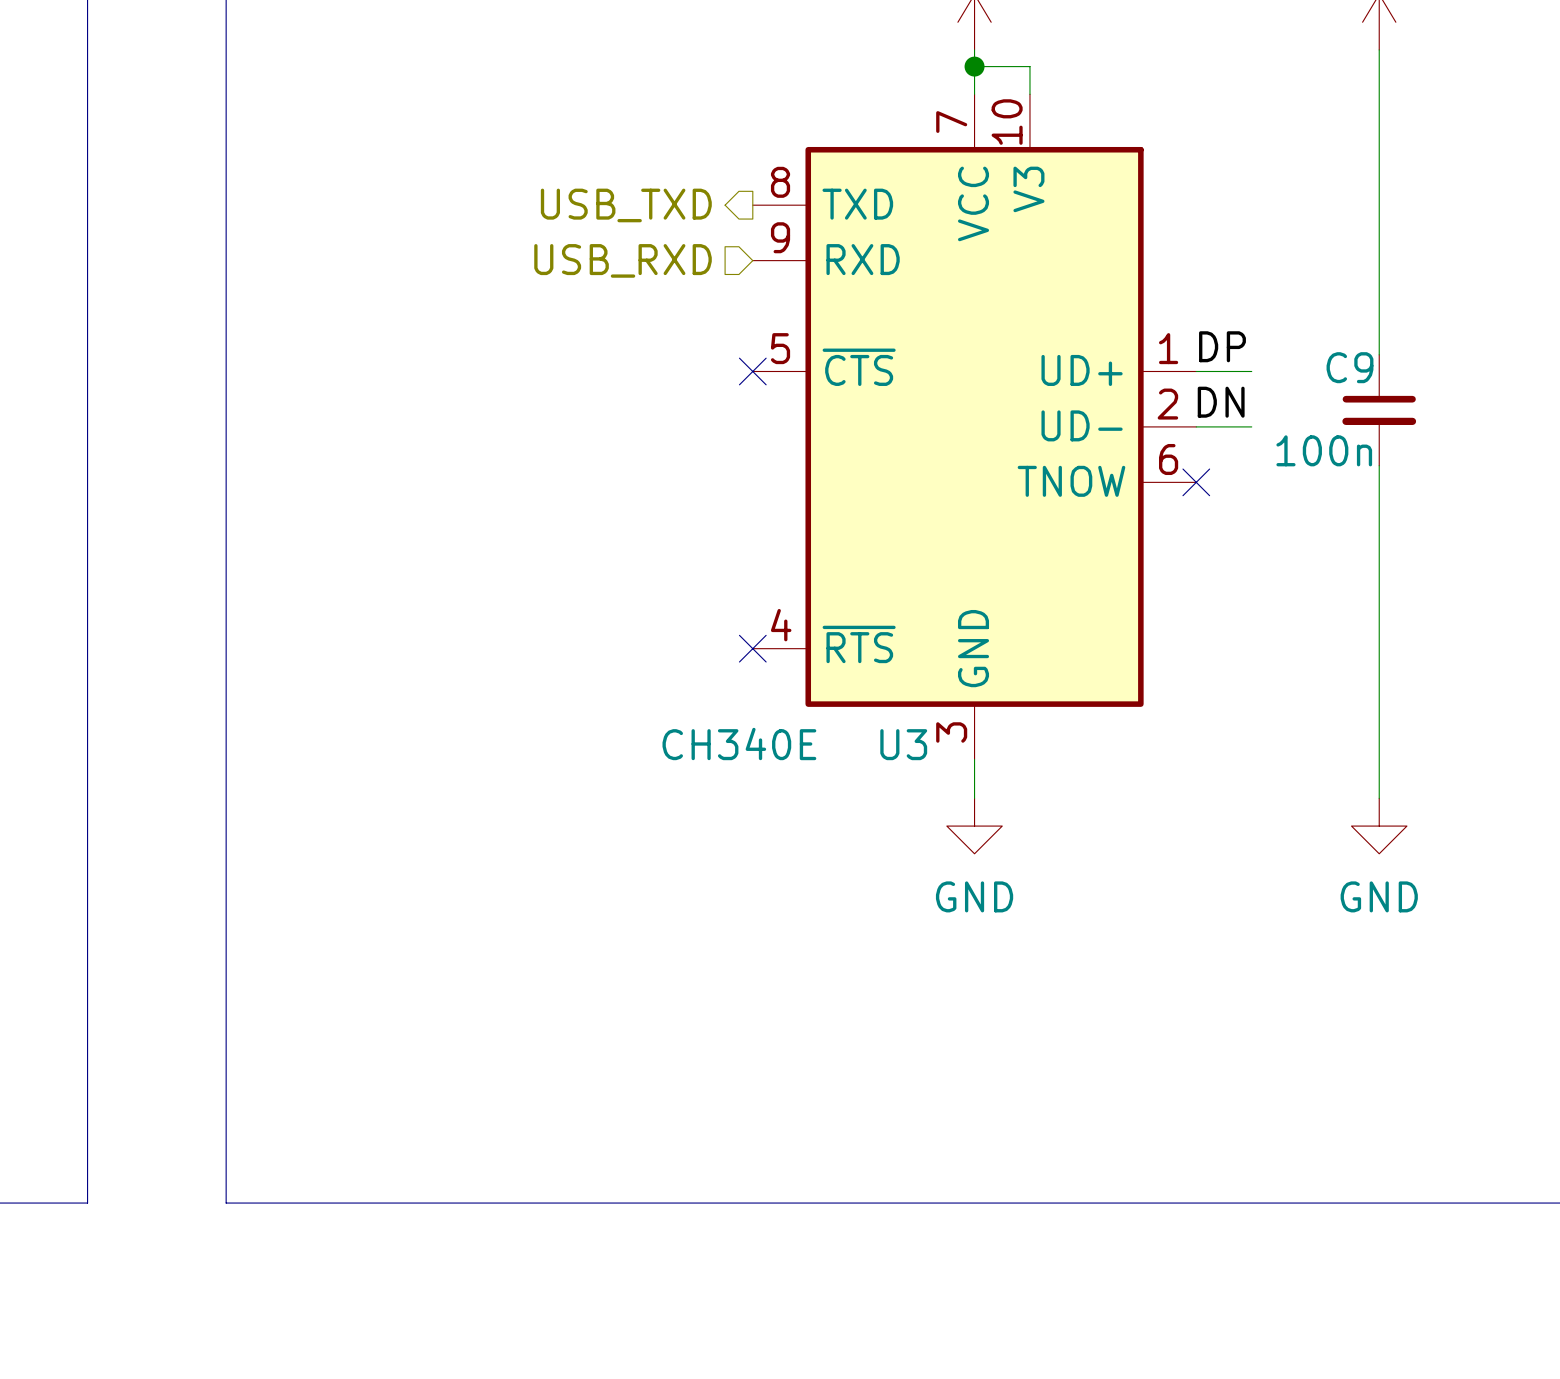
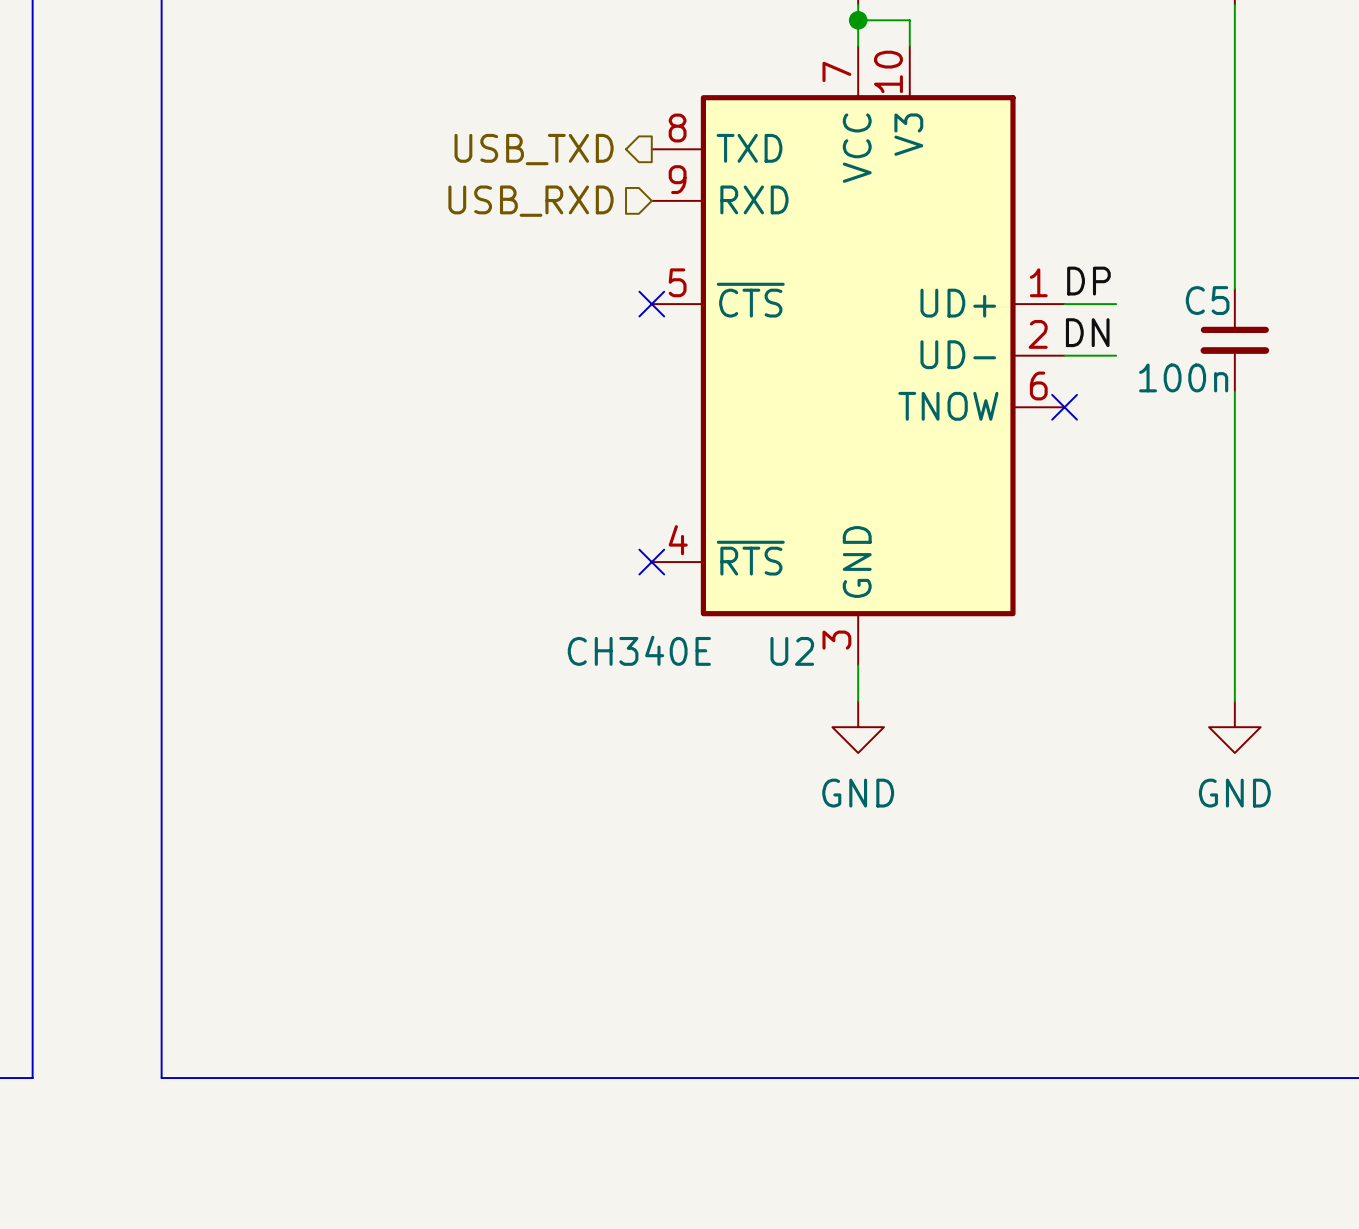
C9 name: C9 (1349, 367) -> C5 (1207, 300)
U3 name: U3 (903, 744) -> U2 (792, 651)

